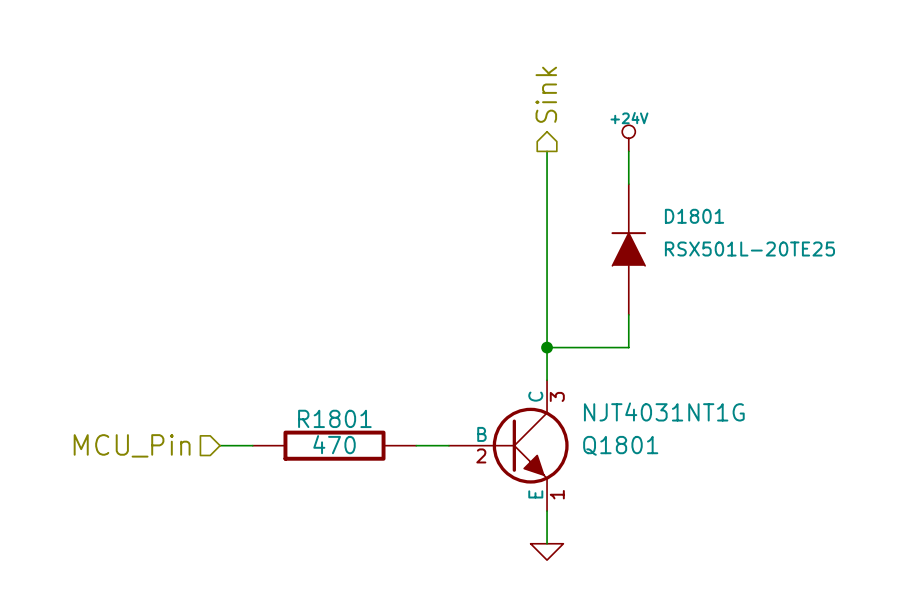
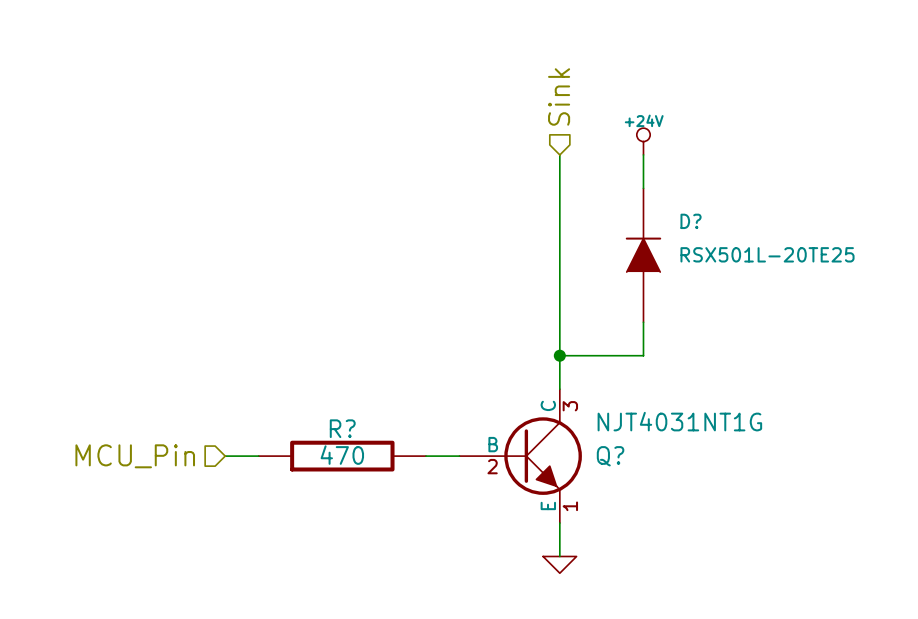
hierarchical label shape: output (546, 94) -> input (559, 96)
D1801 name: D1801 (694, 216) -> D? (691, 221)
R1801 name: R1801 (334, 418) -> R? (342, 428)
Q1801 name: Q1801 (620, 445) -> Q? (610, 456)

